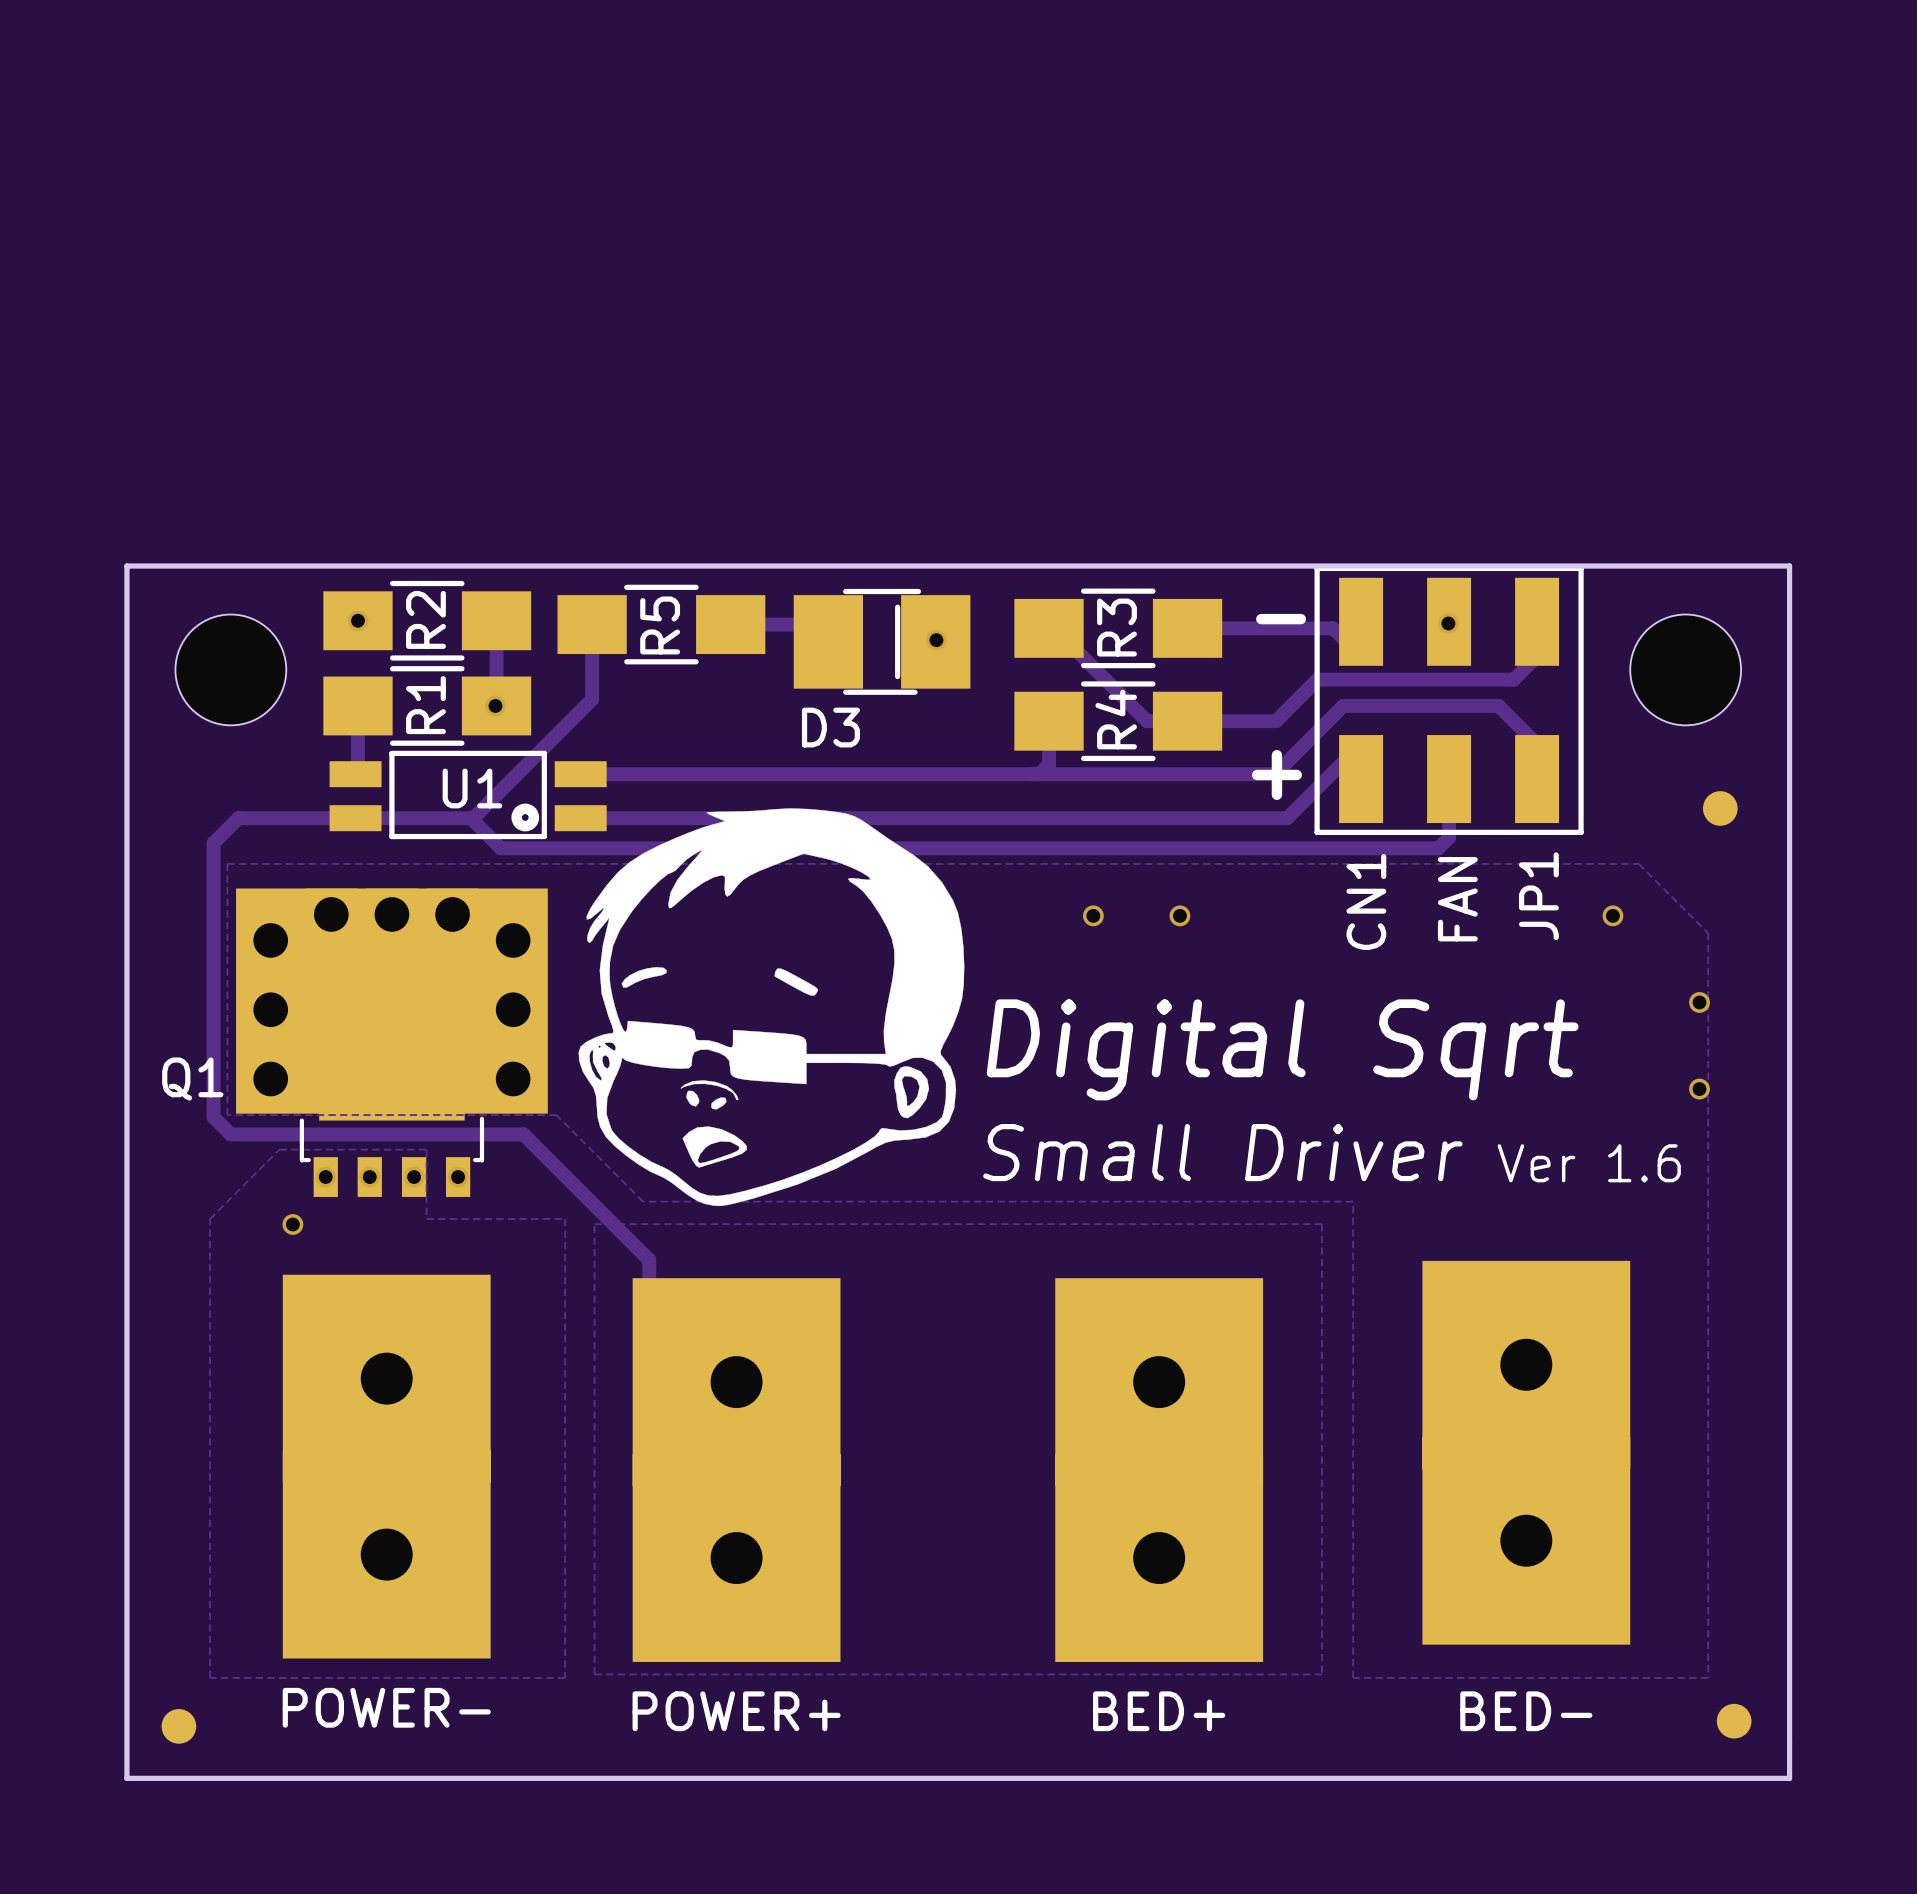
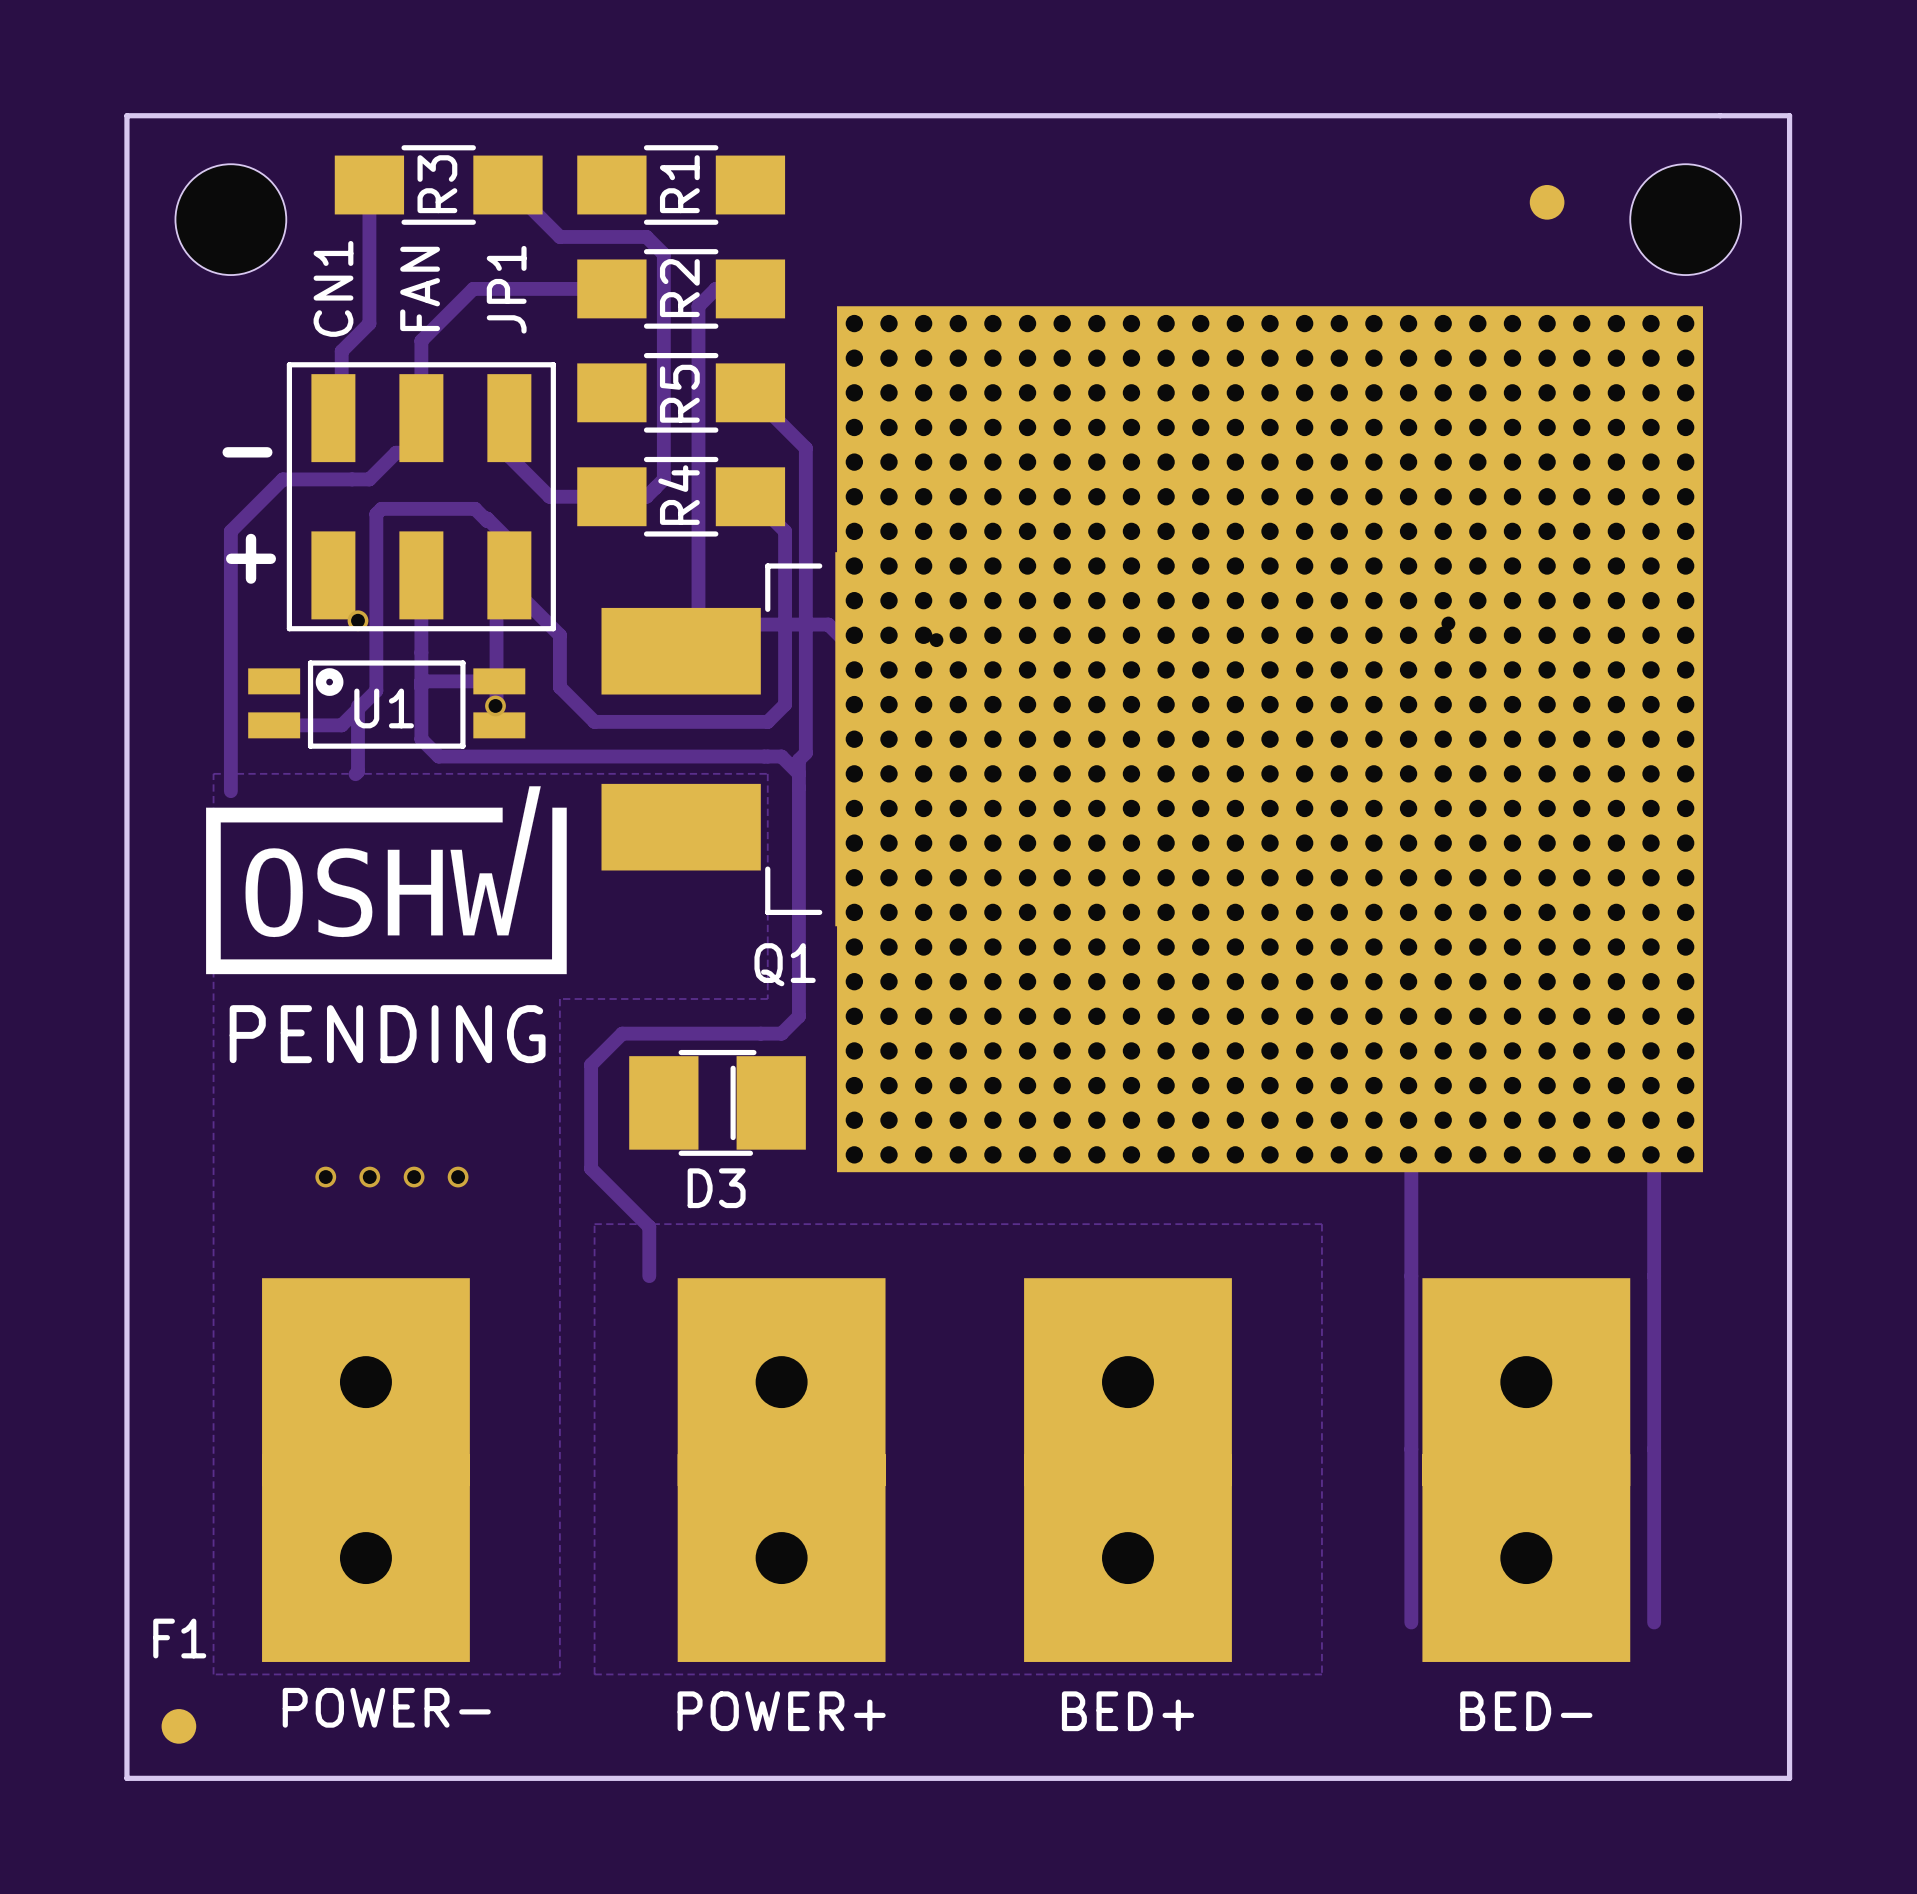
track: none -> (369, 185) (369, 323) (341, 351) (341, 444) (333, 452)
track: none -> (507, 185) (559, 236) (646, 236) (663, 254) (663, 479) (646, 496) (549, 496) (509, 456) (509, 452) (500, 452)
text: none -> FAN (420, 288)
track: none -> (611, 288) (473, 288) (421, 340) (421, 452) (396, 452) (369, 479) (282, 479) (230, 531) (230, 791)
track: none -> (767, 288) (715, 288) (698, 306) (698, 633) (681, 651)
text: none -> JP1 (506, 289)
text: none -> - (247, 452)
track: none -> (750, 496) (785, 531) (785, 704) (767, 721) (594, 721) (559, 687) (559, 635) (509, 584) (509, 540) (475, 508) (381, 508) (376, 514) (376, 690) (341, 725) (274, 725)
track: none -> (421, 540) (421, 739) (438, 756) (781, 756) (798, 773)
text: none -> + (251, 558)
board edge: (126, 566) (1789, 566) -> (126, 566) (126, 115) (1789, 115) (1789, 566)
text: - (1281, 619) -> none
R2 position: (427, 620) -> (681, 288)
track: (592, 624) (592, 699) (473, 818) (238, 818) (213, 843) (213, 1117) (230, 1134) (523, 1134) (649, 1260) -> (778, 392) (750, 392) (805, 448) (805, 753) (798, 759) (798, 1016) (781, 1033) (622, 1033) (591, 1064) (591, 1168) (649, 1226) (649, 1260)
R5 position: (661, 624) -> (681, 392)
track: (1054, 628) (1147, 721) (1275, 721) (1317, 679) (1513, 679) (1537, 656) -> none
R3 position: (1118, 628) -> (438, 185)
track: (1187, 628) (1333, 628) (1361, 656) (1359, 656) -> none
D3 position: (882, 641) -> (717, 1102)
part position: (230, 669) -> (230, 219)
part position: (1685, 669) -> (1685, 219)
track: none -> (421, 681) (499, 681)
CN1 position: (1449, 700) -> (421, 496)
R1 position: (427, 705) -> (681, 185)
R4 position: (1118, 721) -> (681, 496)
D3 name position: D3 (830, 727) -> D3 (716, 1188)
track: (1361, 744) (1287, 818) (580, 818) -> none
track: (1449, 744) (1449, 837) (1438, 848) (501, 848) (470, 818) -> none
track: (1537, 744) (1498, 705) (1343, 705) (1275, 774) (580, 774) -> none
zone outline: none -> (213, 773) (213, 1674) (559, 1674) (559, 999) (767, 999) (767, 773) (213, 773)
text: + (1276, 774) -> none
drawing: none -> [206, 786, 567, 975]
U1 rotation: 0° (468, 794) -> 180° (386, 704)
drawing: [578, 808, 965, 1207] -> none
part position: (1720, 808) -> (1547, 202)
zone outline: (227, 863) (227, 1115) (556, 1115) (643, 1201) (1353, 1201) (1353, 1677) (1708, 1677) (1708, 933) (1638, 863) (227, 863) -> none
Q1 footprint: [236, 888, 548, 1197] -> [601, 306, 1703, 1173]
text: JP1 (1538, 896) -> none
text: FAN (1457, 899) -> none
CN1 name position: CN1 (1366, 902) -> CN1 (333, 288)
via: (1093, 915) -> none
via: (1179, 915) -> none
via: (1612, 915) -> none
via: (1699, 1002) -> none
text: Digital Sqrt (1282, 1049) -> none
Q1 name position: Q1 (192, 1079) -> Q1 (785, 964)
via: (1699, 1089) -> none
zone outline: (279, 1149) (210, 1218) (210, 1677) (565, 1677) (565, 1218) (426, 1218) (426, 1149) (279, 1149) -> none
text: Small Driver (1222, 1152) -> none
track: none -> (1408, 1154) (1411, 1157) (1411, 1622)
track: none -> (1651, 1154) (1654, 1157) (1654, 1622)
text: Ver 1.6 (1589, 1163) -> none
via: (292, 1224) -> none
BED- position: (1526, 1452) -> (1526, 1470)
POWER- position: (386, 1466) -> (365, 1470)
POWER+ position: (736, 1470) -> (781, 1470)
BED+ position: (1159, 1470) -> (1127, 1470)
F1 name: none -> F1 (179, 1638)
part: (1734, 1721) -> none

